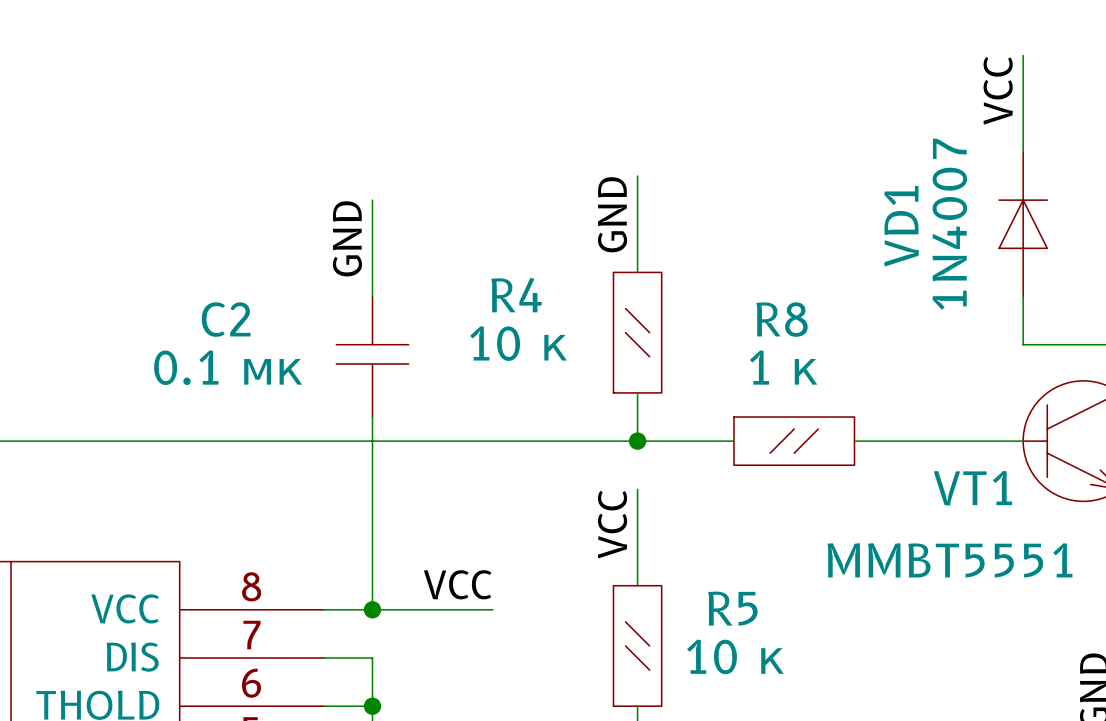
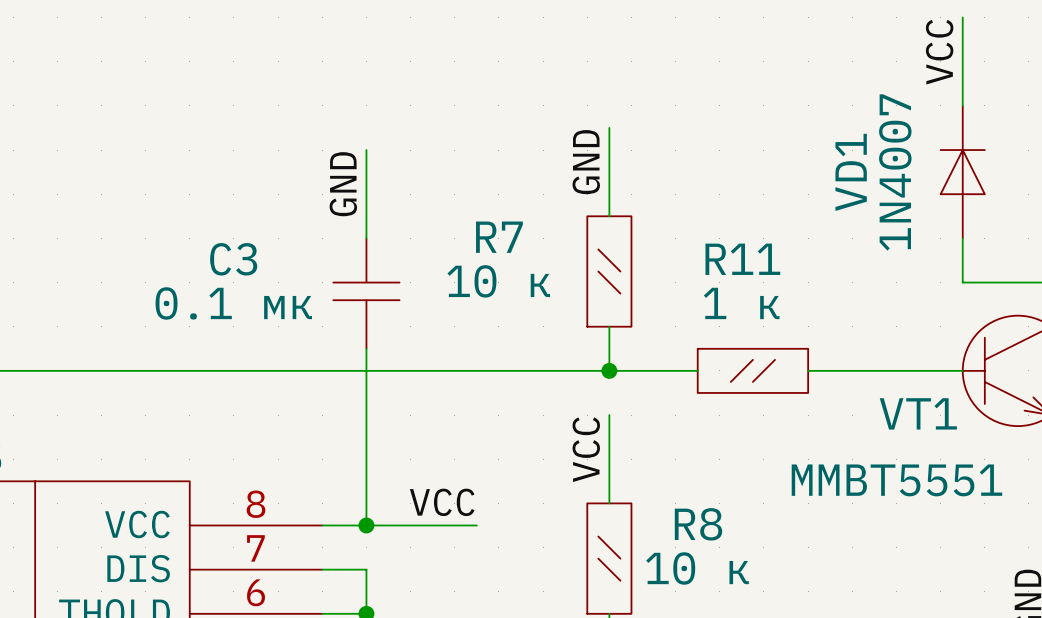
R4 name: R4 (516, 295) -> R7 (499, 237)
C2 name: C2 (226, 319) -> C3 (233, 259)
R8 name: R8 (782, 319) -> R11 (742, 259)
R5 name: R5 (732, 608) -> R8 (698, 524)

